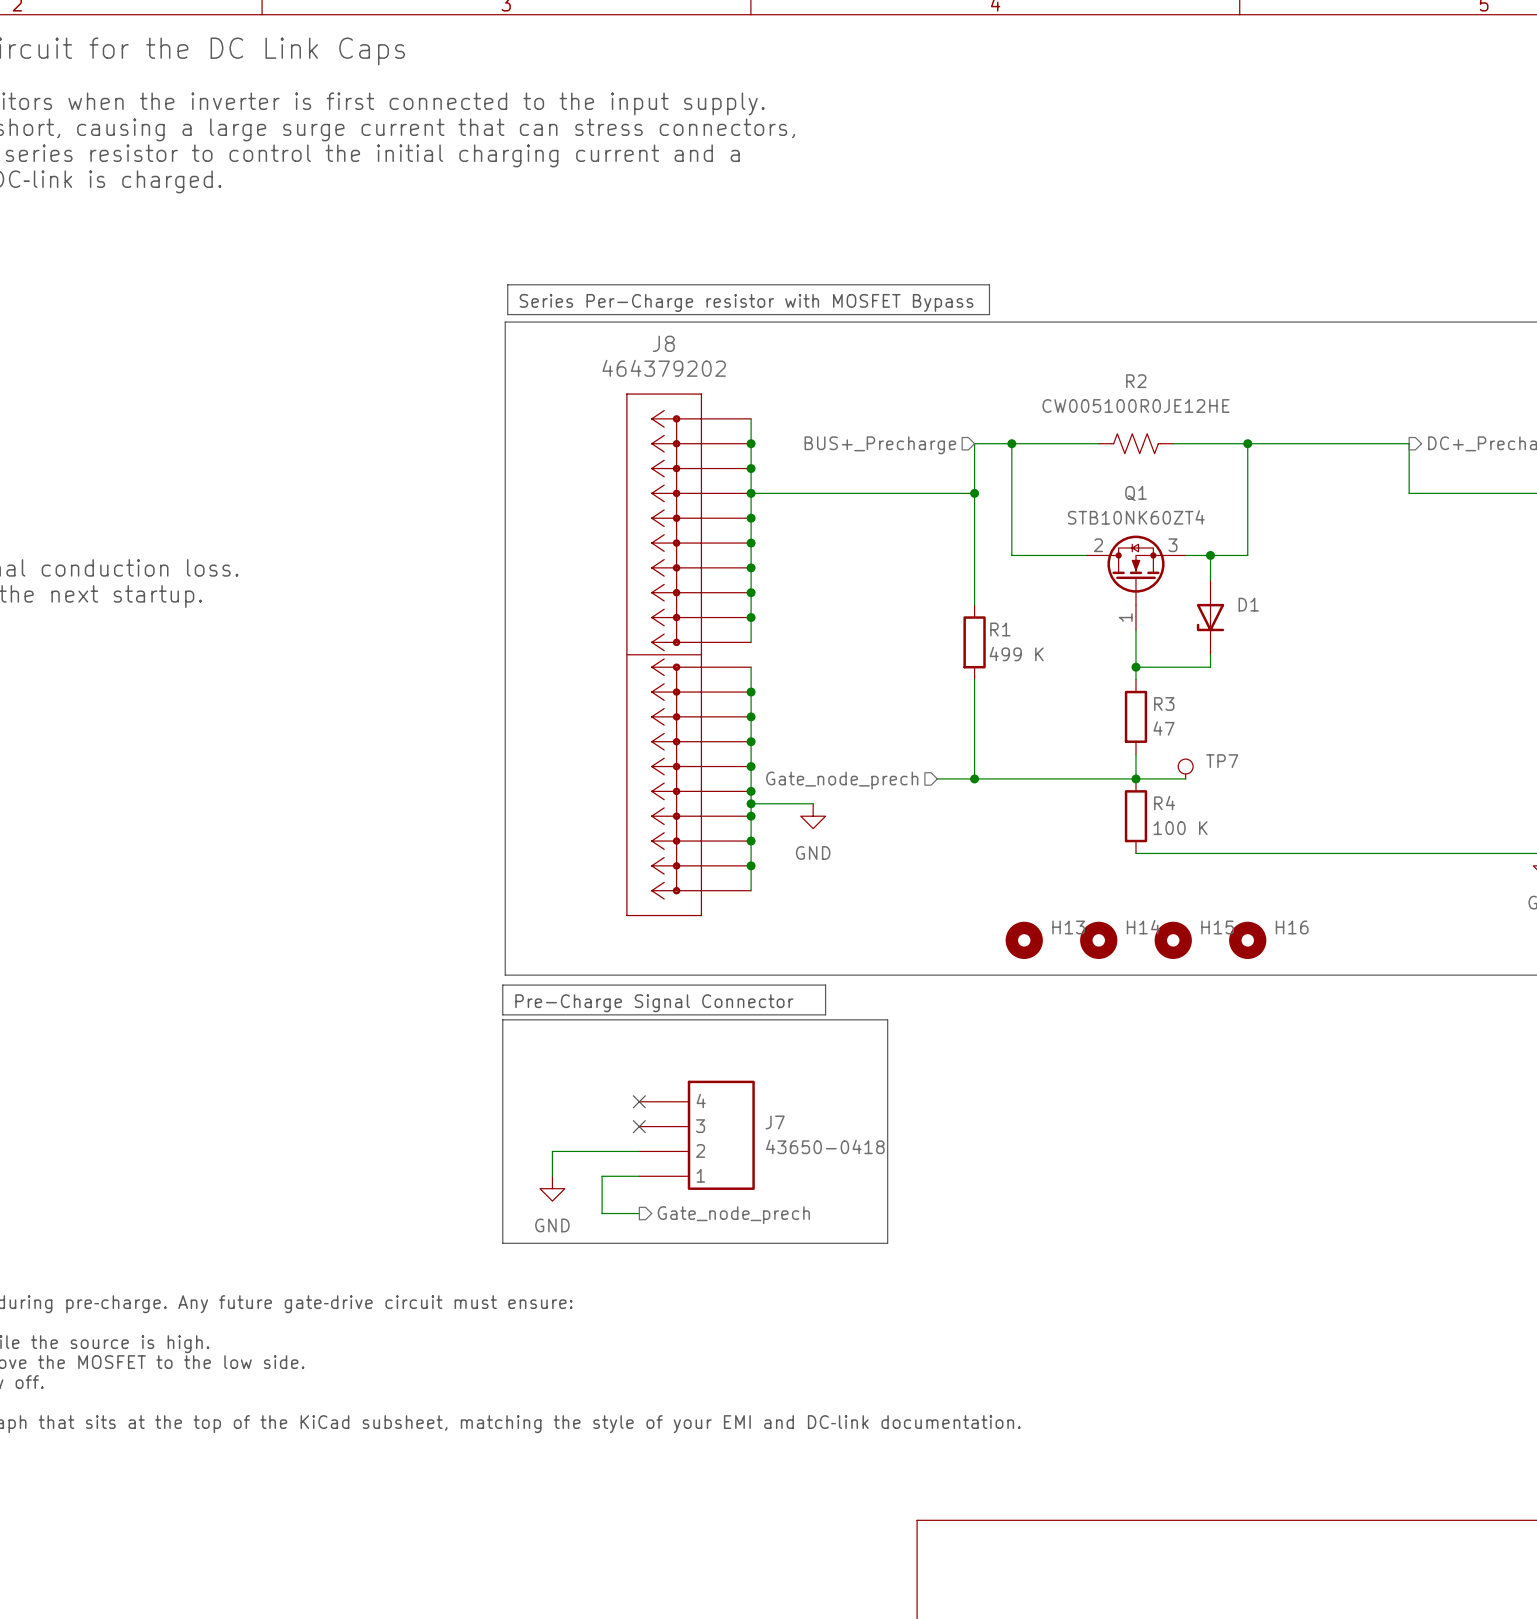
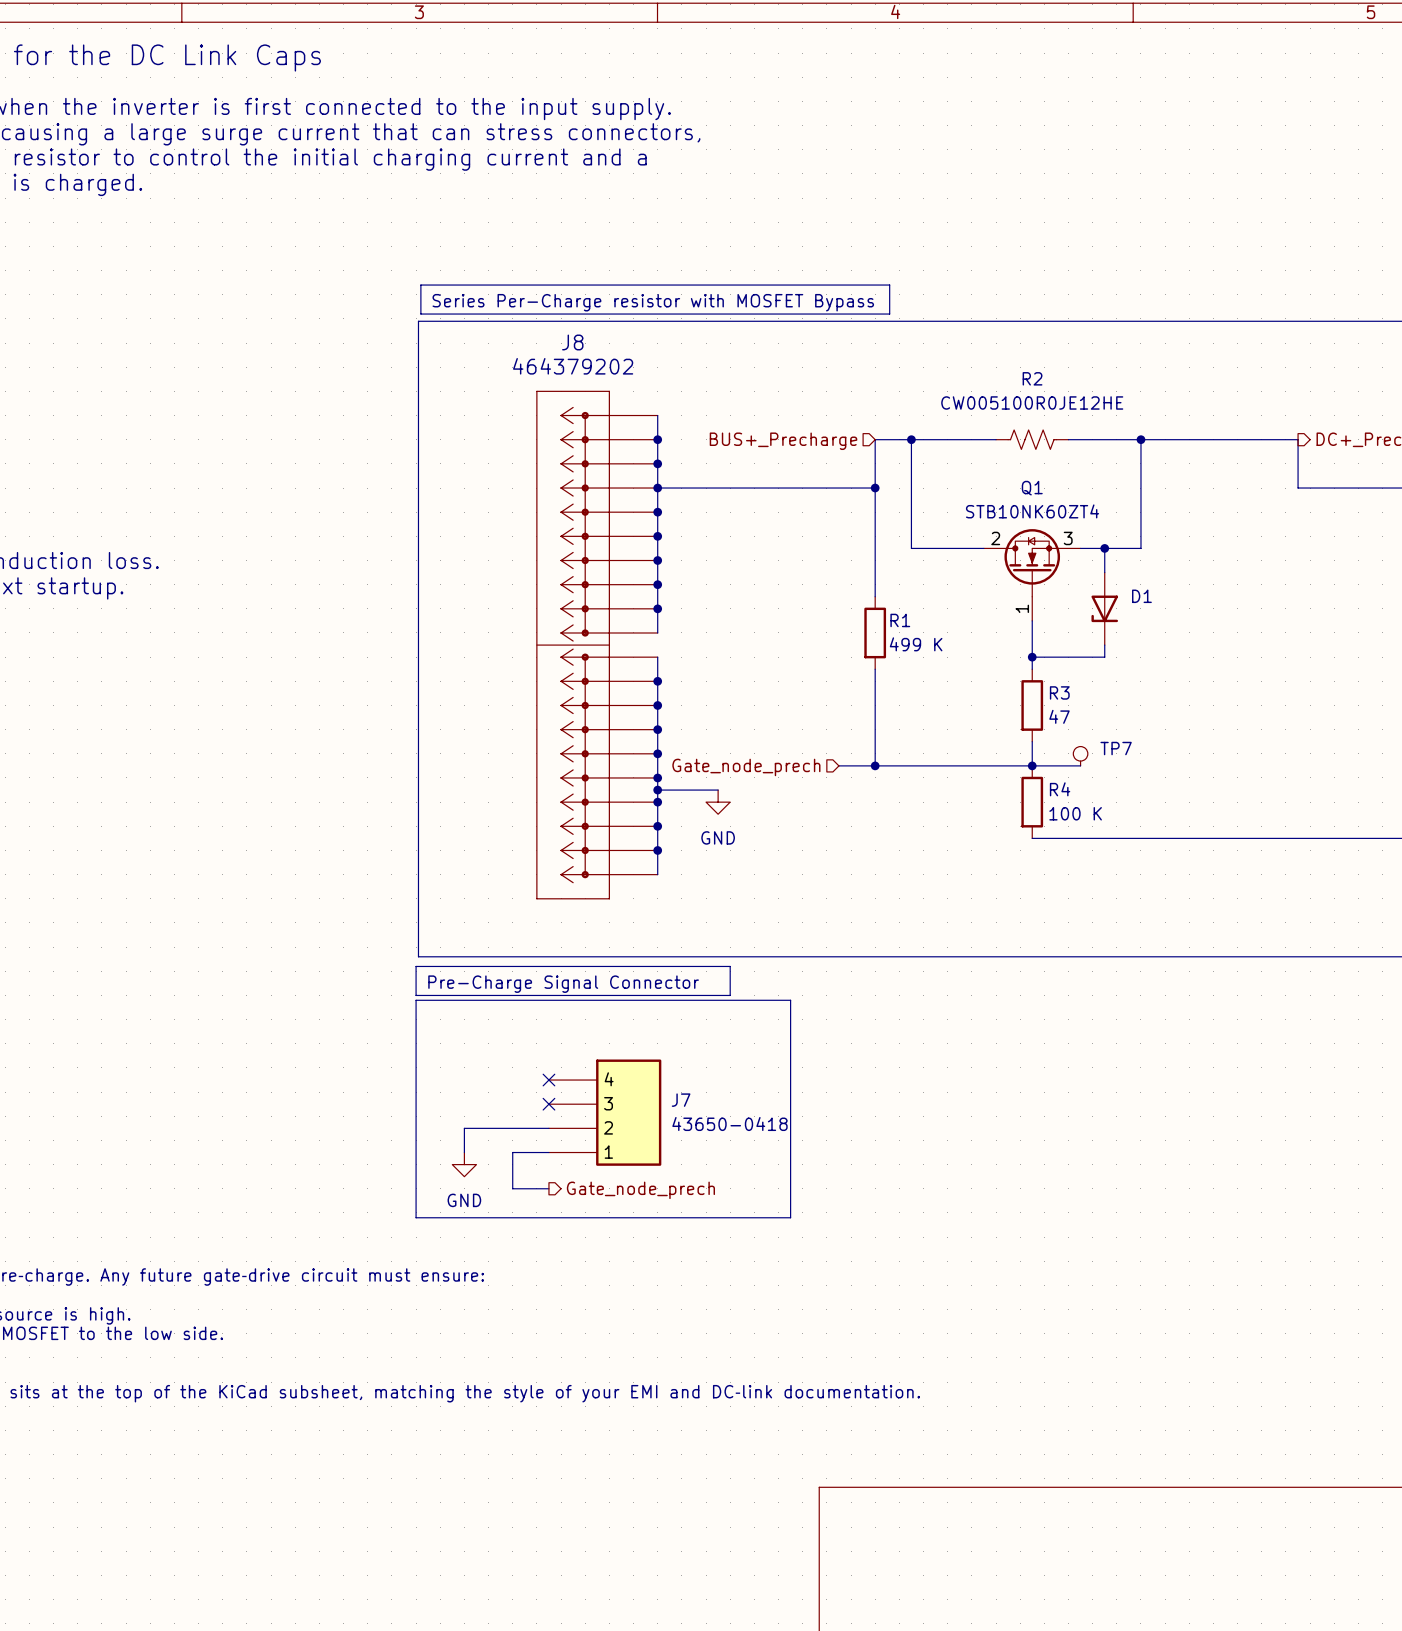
H13: (1024, 940) -> none
H14: (1098, 940) -> none
H15: (1173, 940) -> none
H16: (1247, 940) -> none

